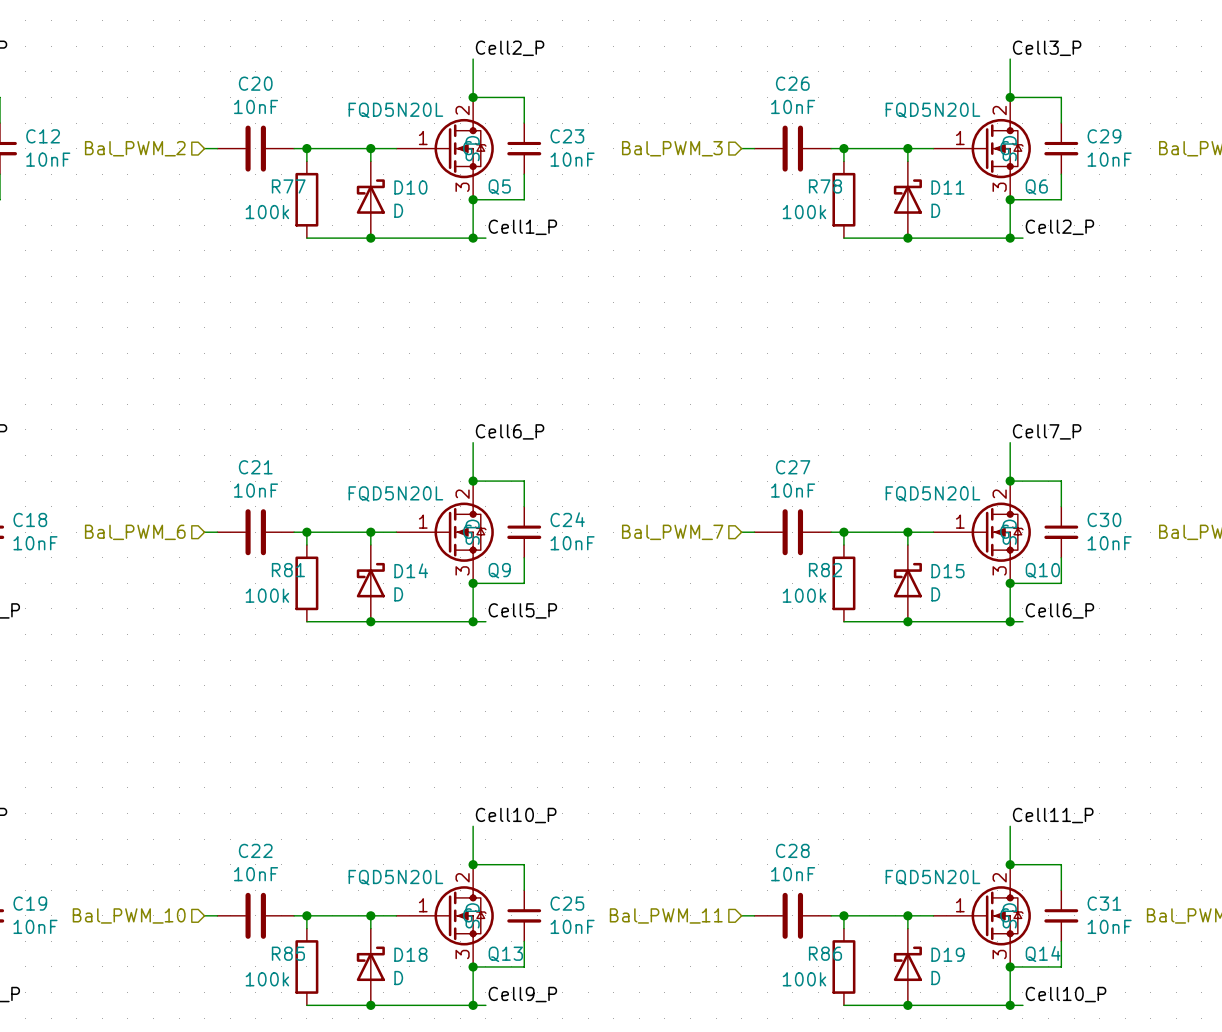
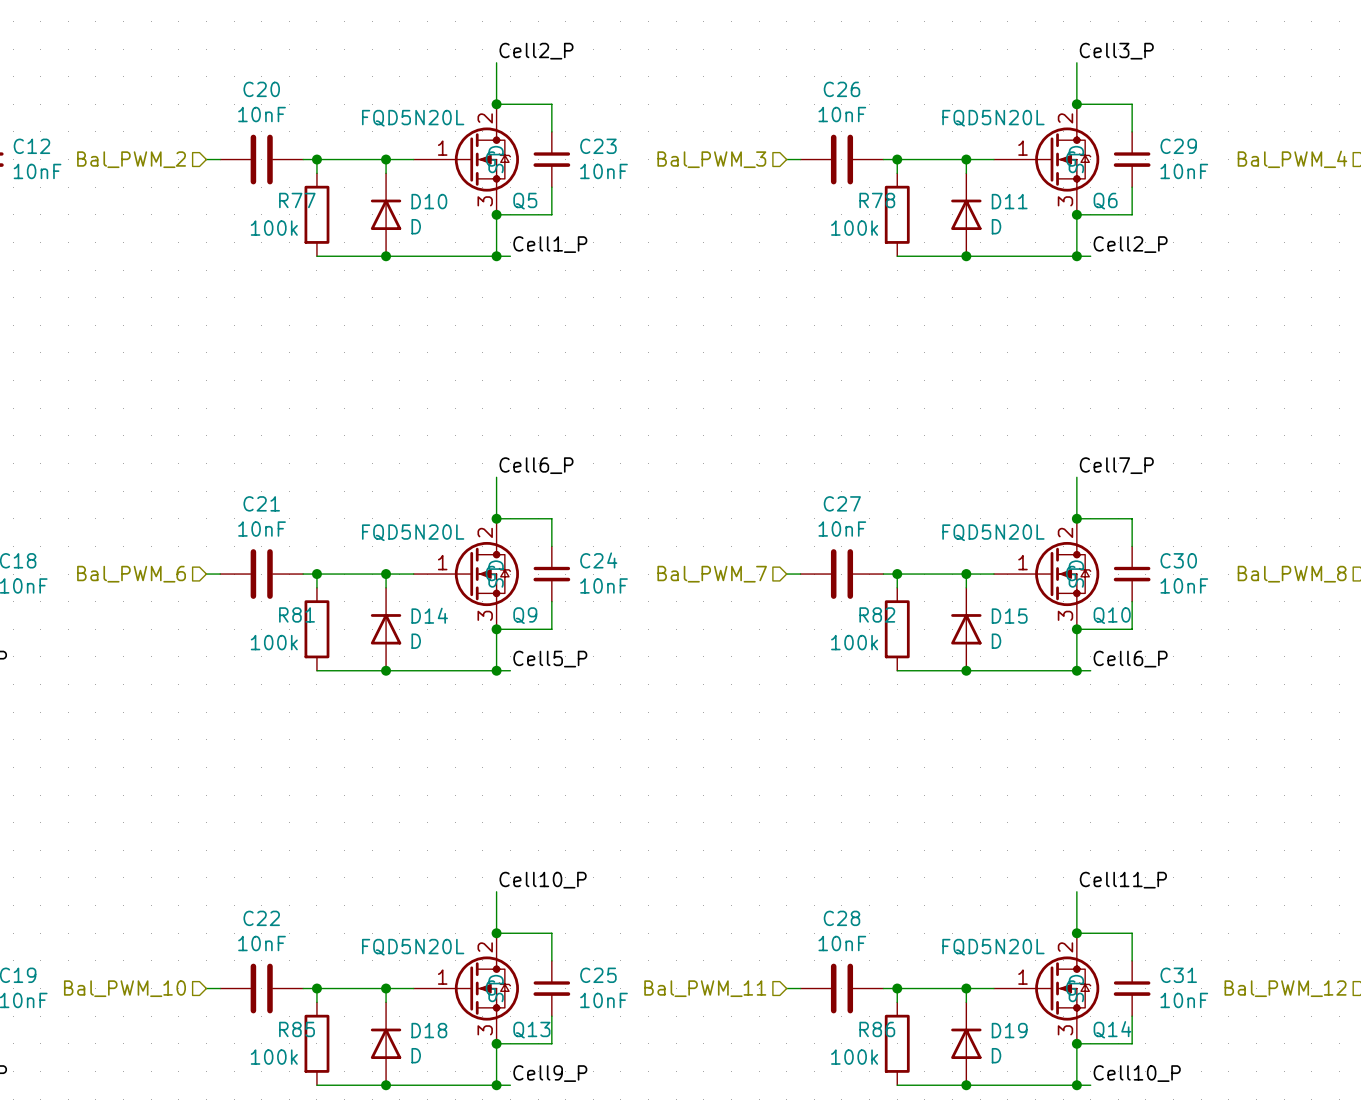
D10 symbol: [356, 161, 385, 239] -> [370, 173, 402, 257]
D11 symbol: [893, 161, 922, 239] -> [951, 173, 982, 257]
D14 symbol: [356, 545, 385, 622] -> [370, 587, 402, 671]
D15 symbol: [893, 545, 922, 622] -> [951, 587, 982, 671]
D18 symbol: [356, 928, 385, 1006] -> [370, 1002, 402, 1086]
D19 symbol: [893, 928, 922, 1006] -> [951, 1002, 982, 1086]

